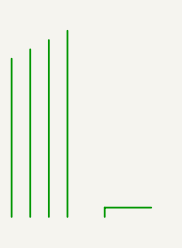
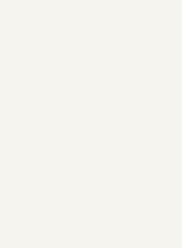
wire: (67, 30) (67, 216) -> none
wire: (48, 40) (48, 216) -> none
wire: (30, 49) (30, 216) -> none
wire: (11, 58) (11, 216) -> none
wire: (151, 207) (104, 207) (104, 216) -> none

